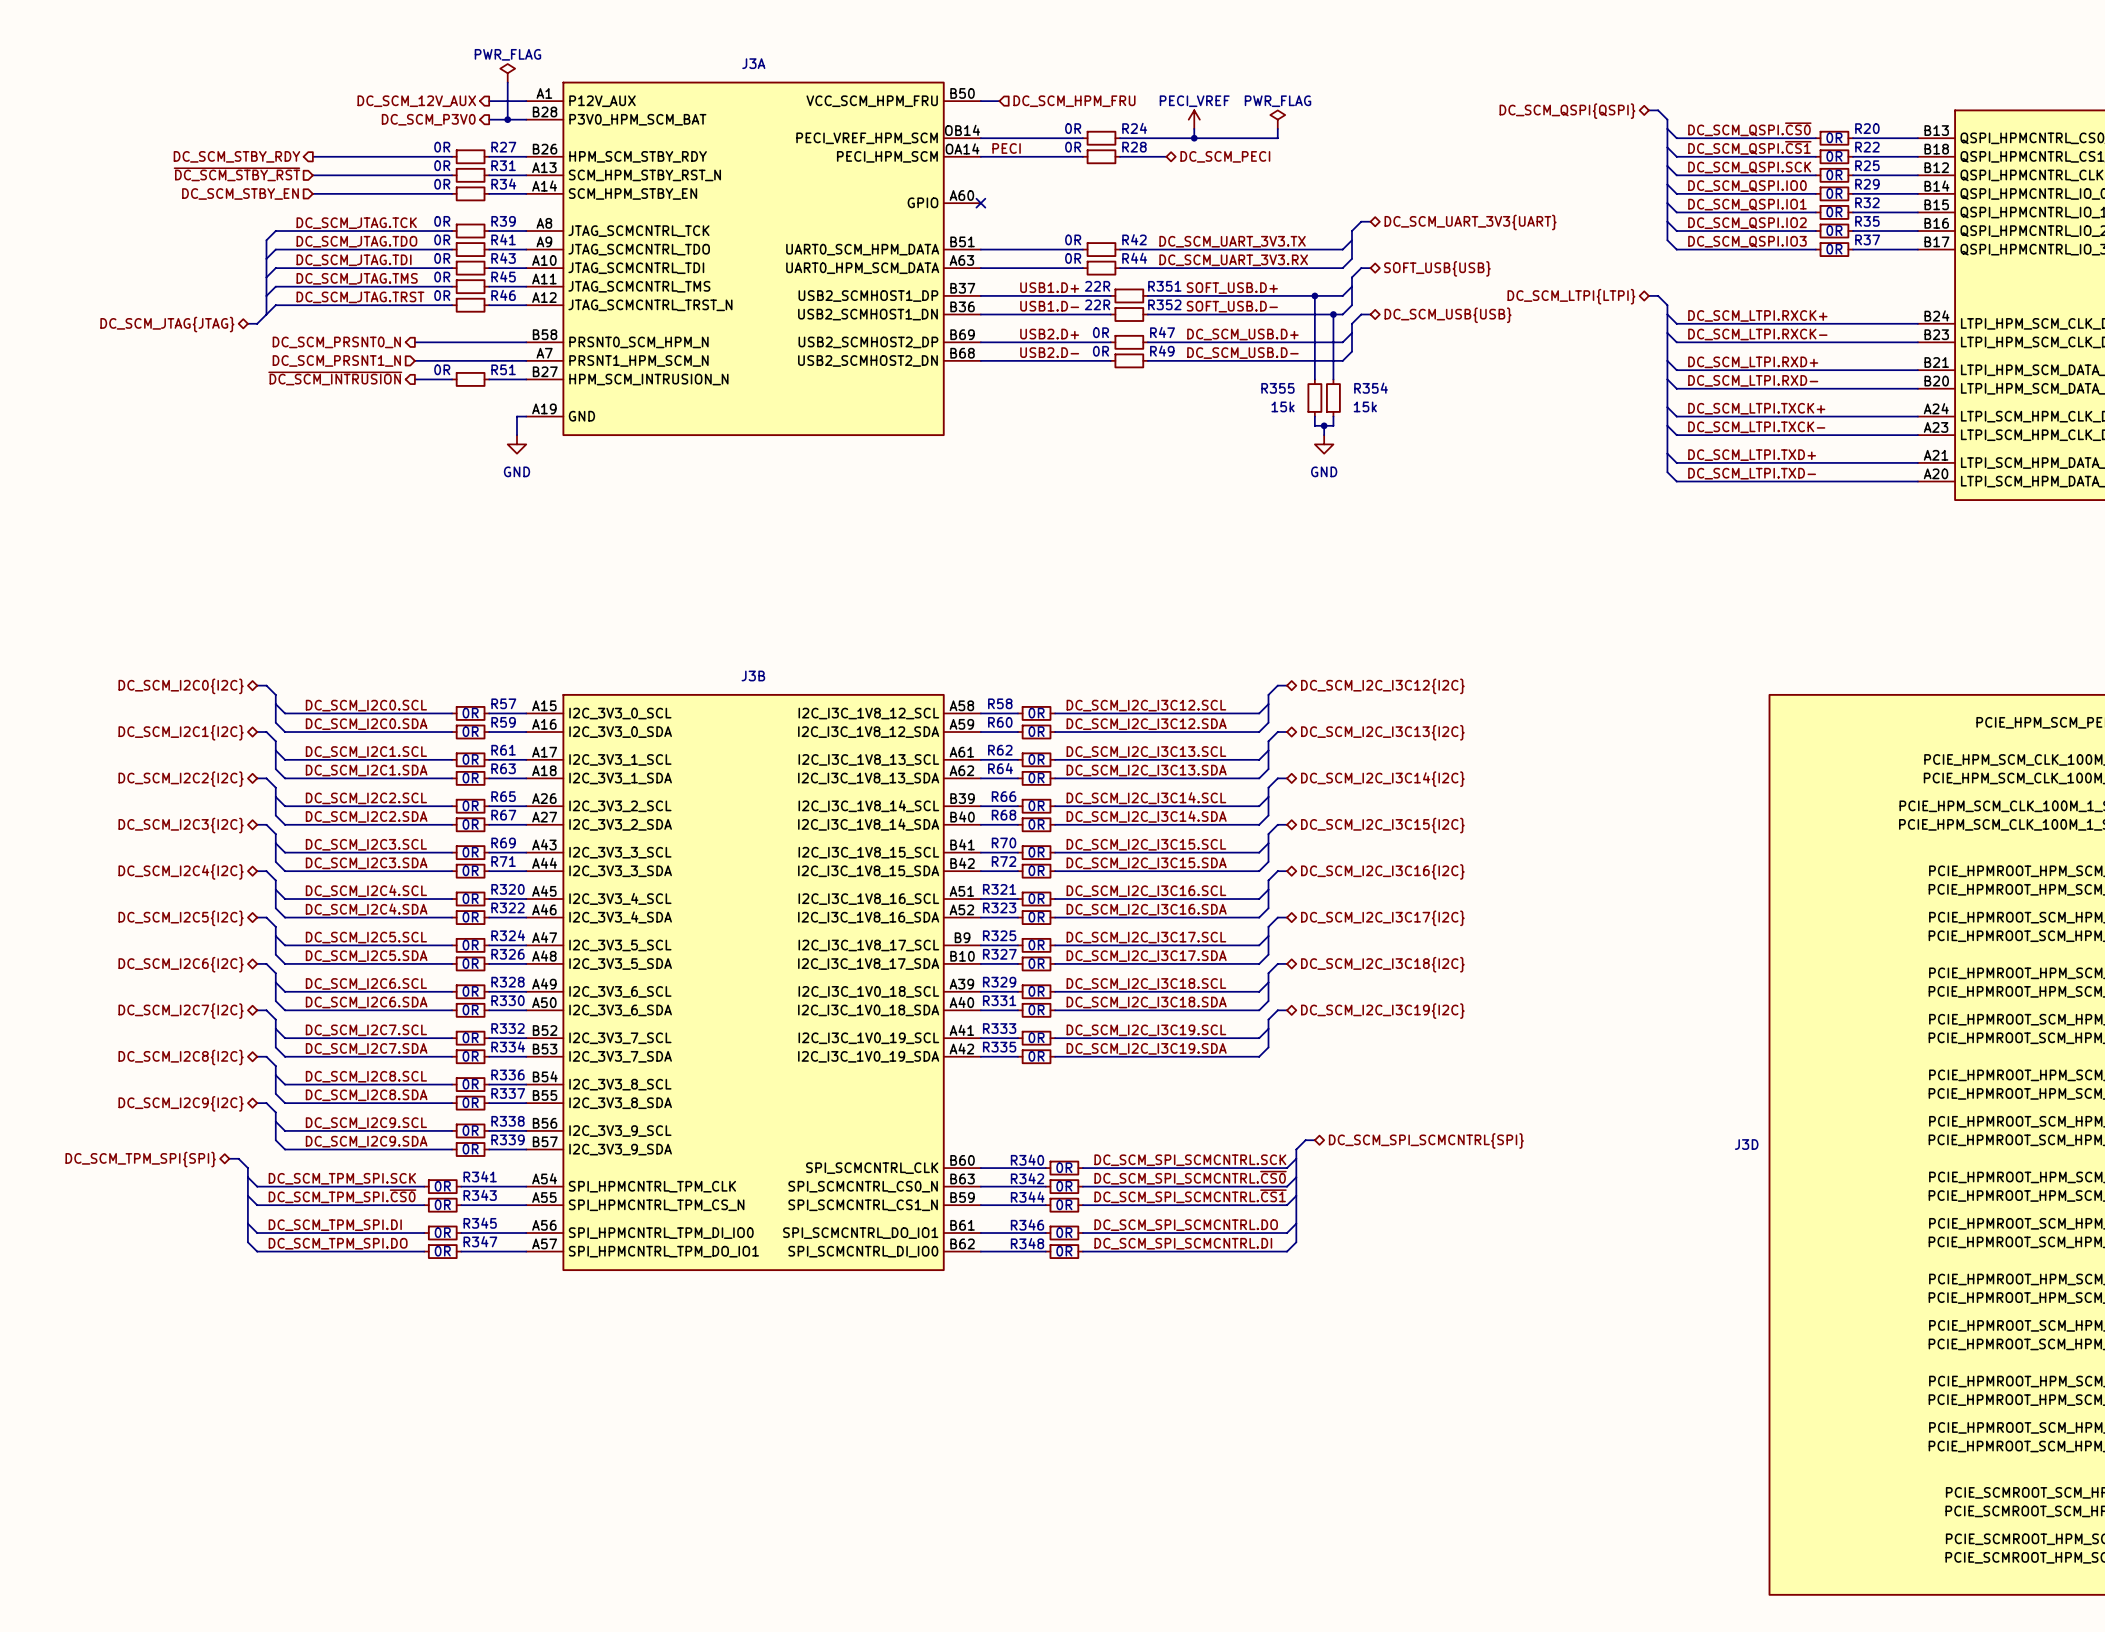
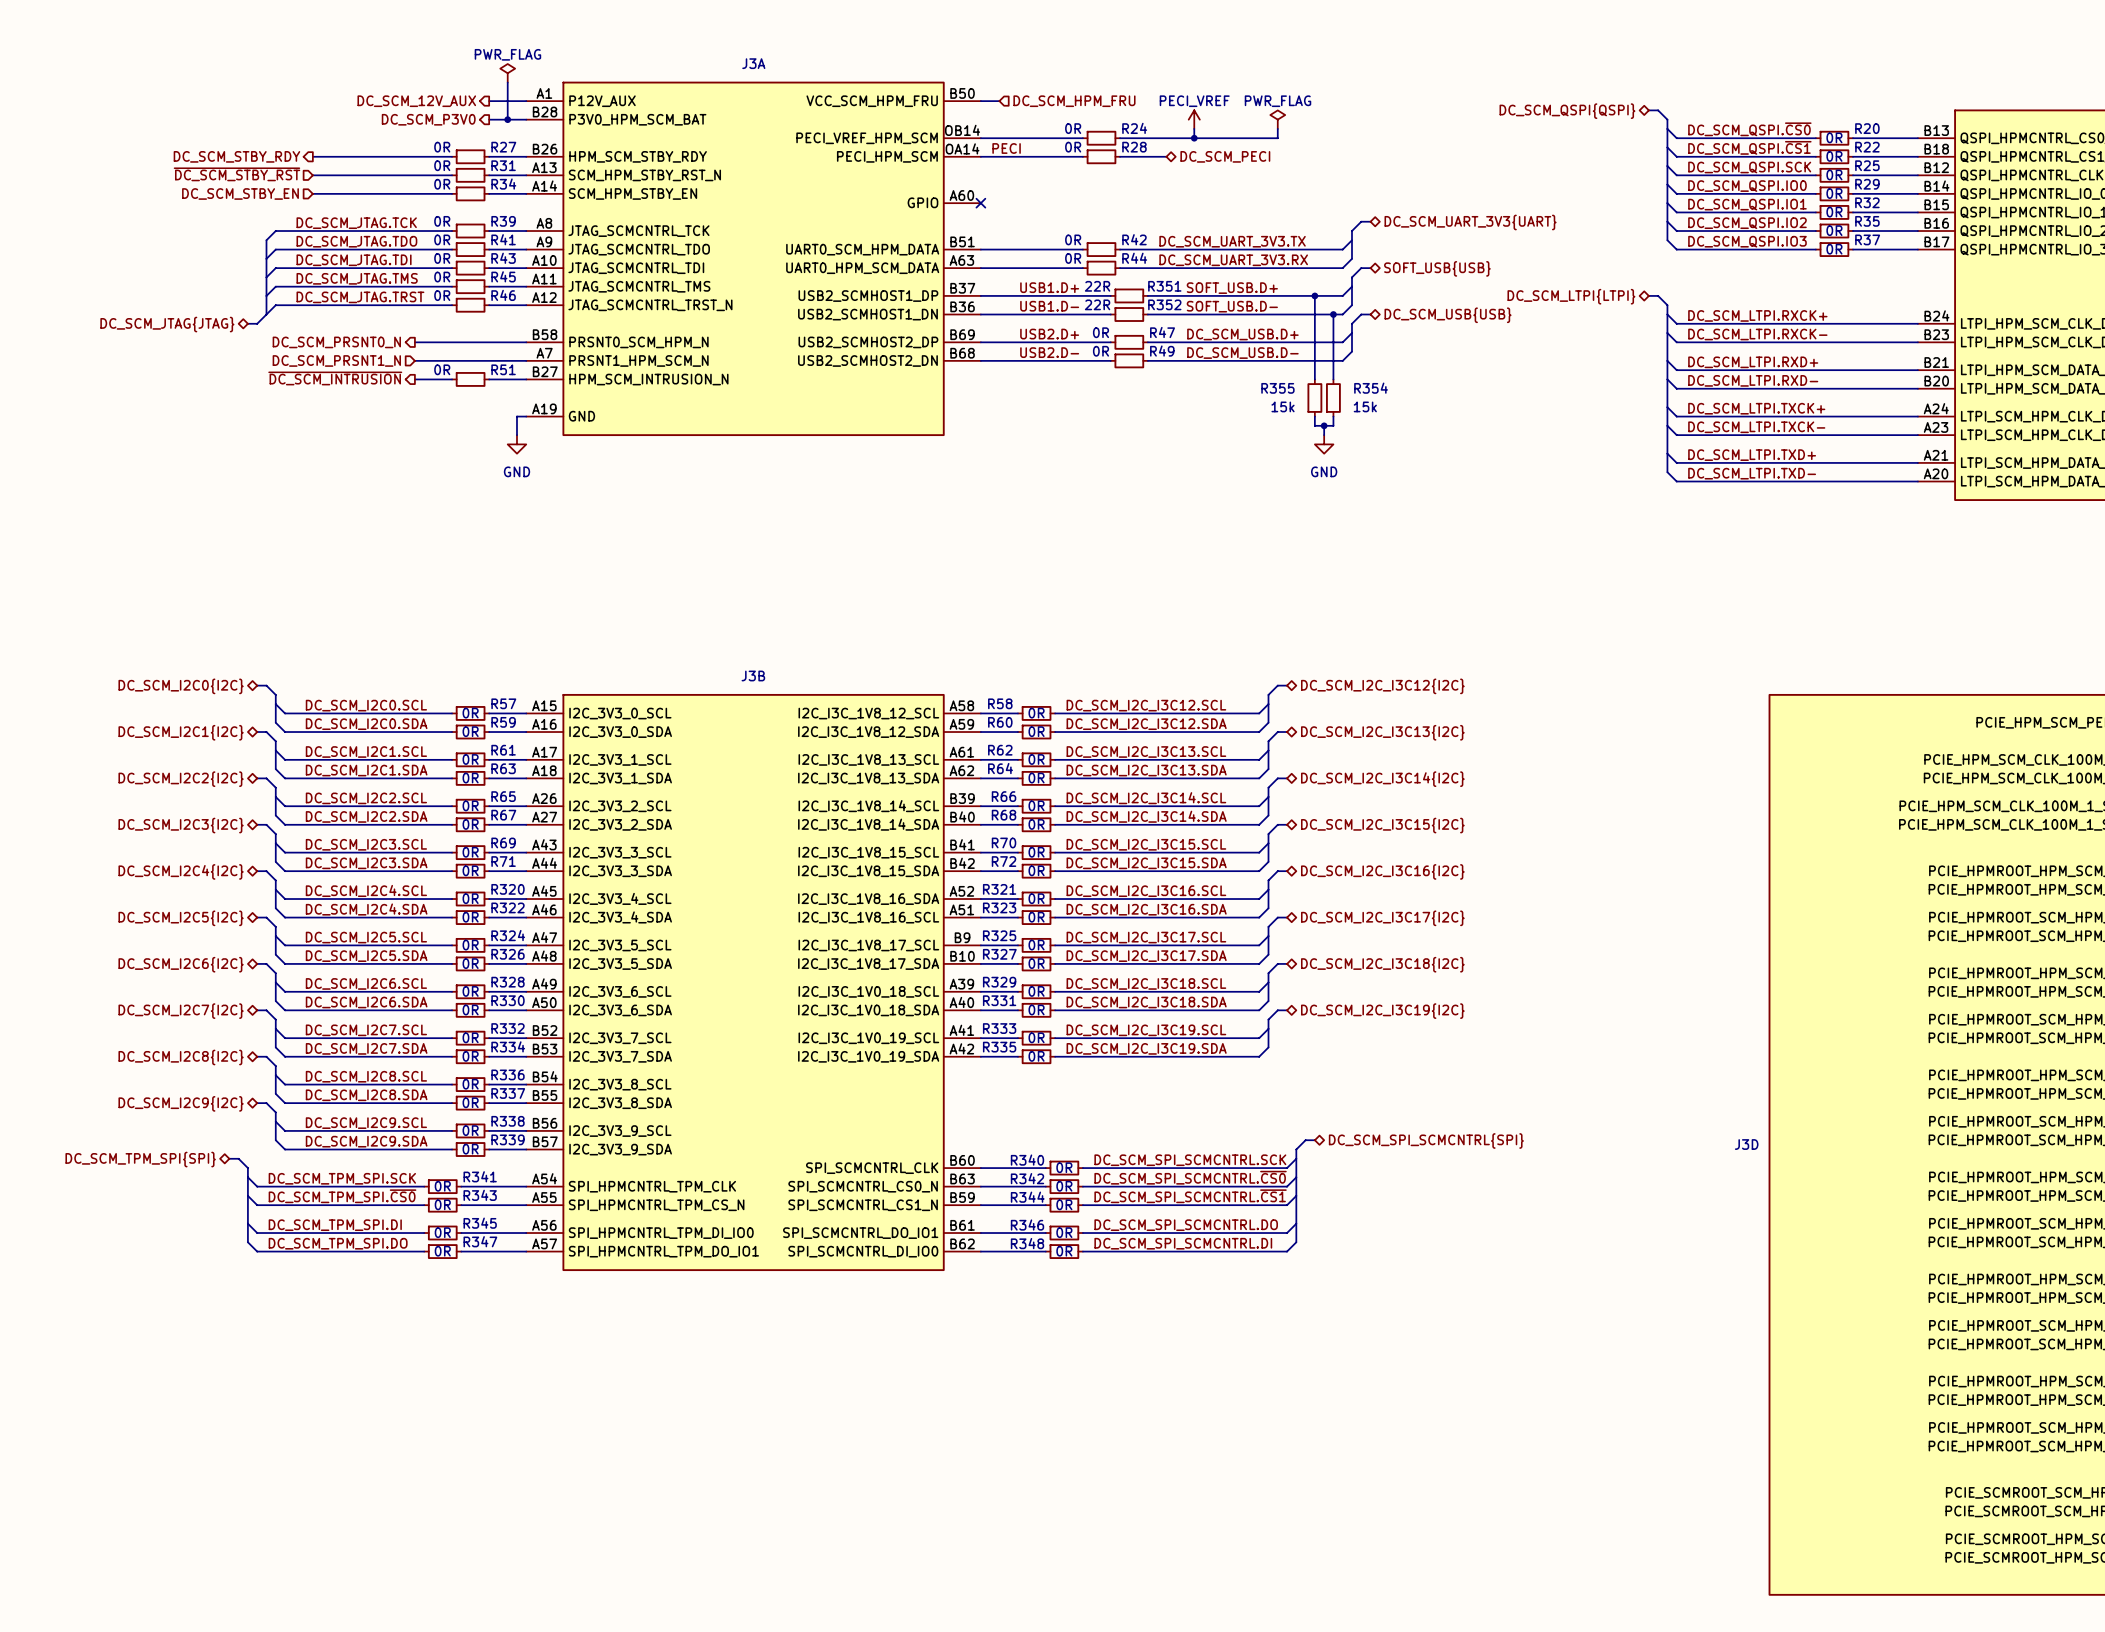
J3B pin number: A51 (961, 891) -> A52 (961, 891)
J3B pin name: I2C_I3C_1V8_16_SCL (868, 899) -> I2C_I3C_1V8_16_SDA (868, 899)
J3B pin number: A52 (961, 909) -> A51 (961, 909)
J3B pin name: I2C_I3C_1V8_16_SDA (868, 917) -> I2C_I3C_1V8_16_SCL (868, 917)

